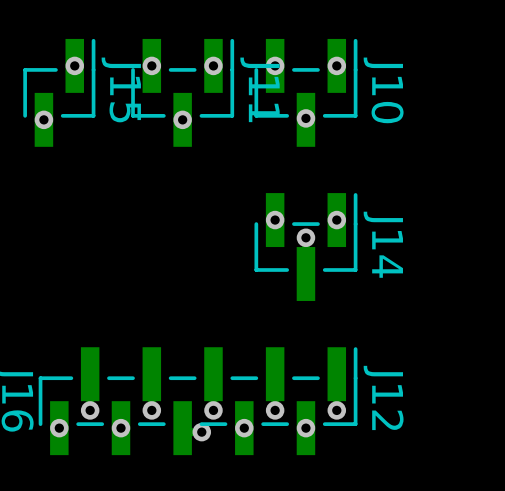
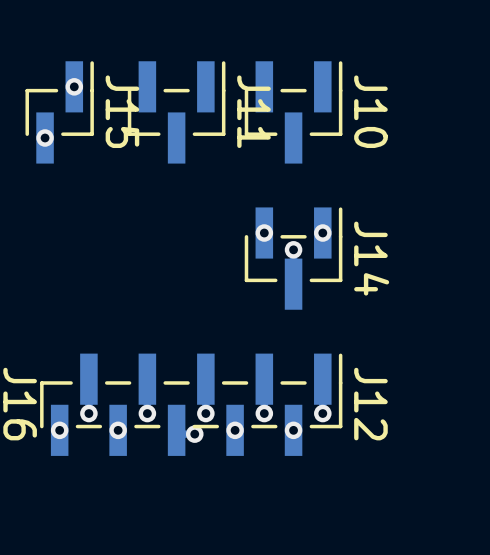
via: (151, 65) -> none
via: (213, 65) -> none
via: (275, 65) -> none
via: (336, 65) -> none
via: (305, 118) -> none
via: (182, 119) -> none

